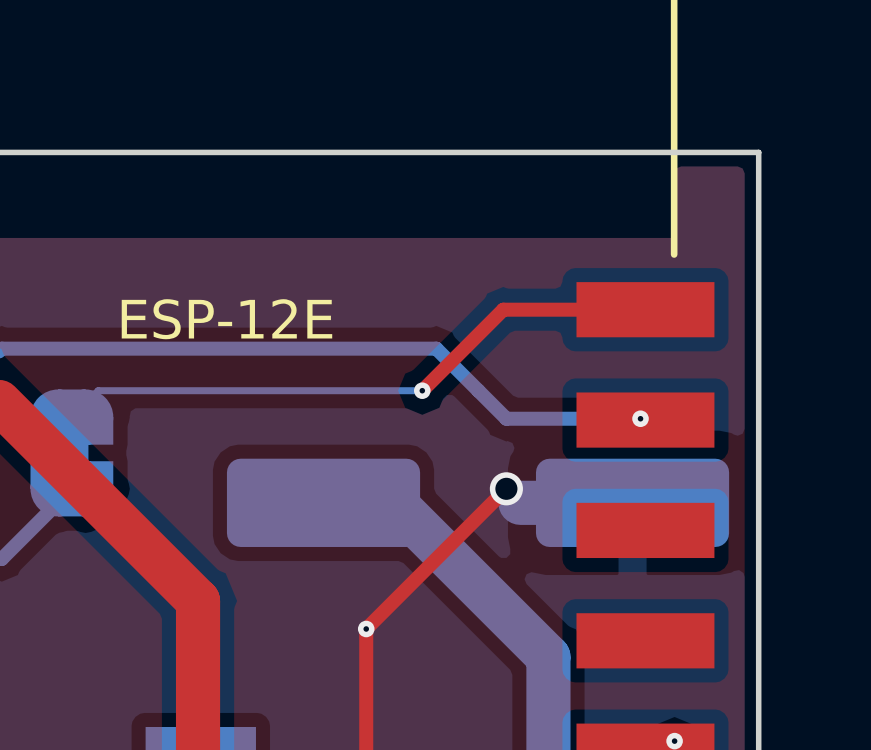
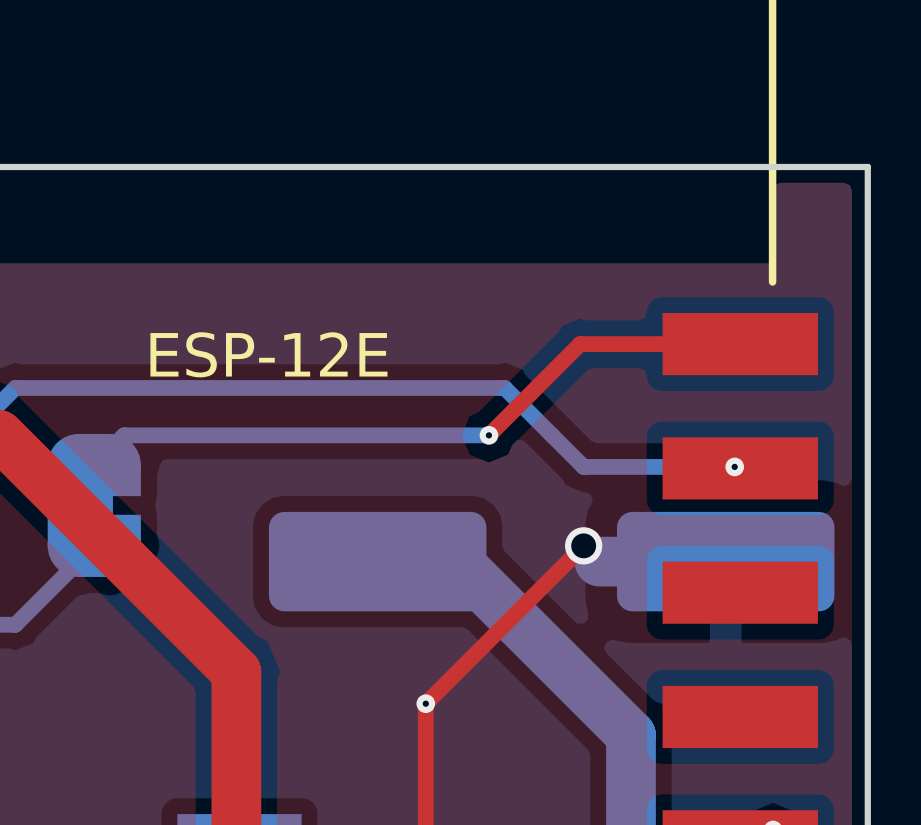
bottom track width: thin (422, 390) (98, 390) (71, 417) -> thick (488, 435) (124, 435) (94, 465)

